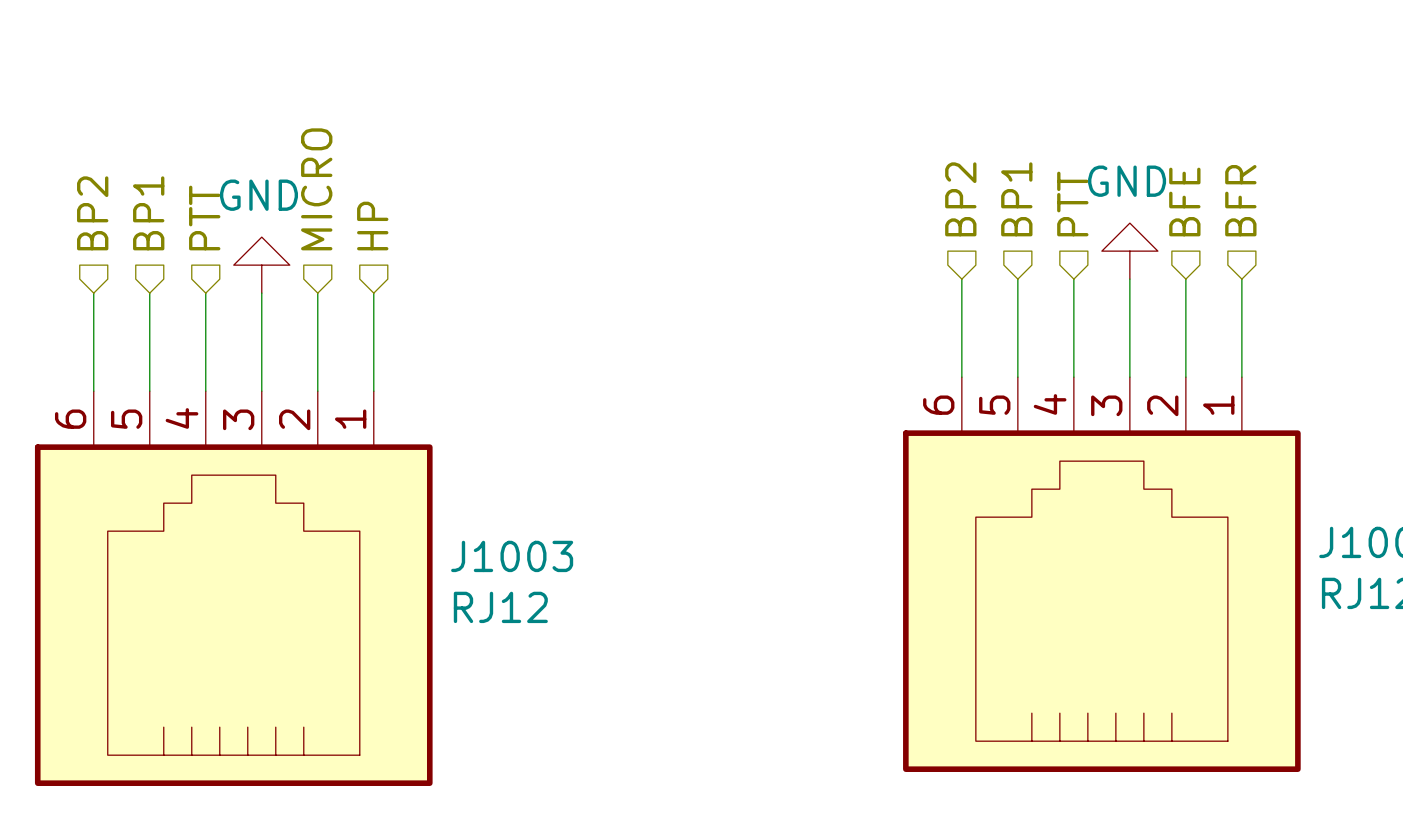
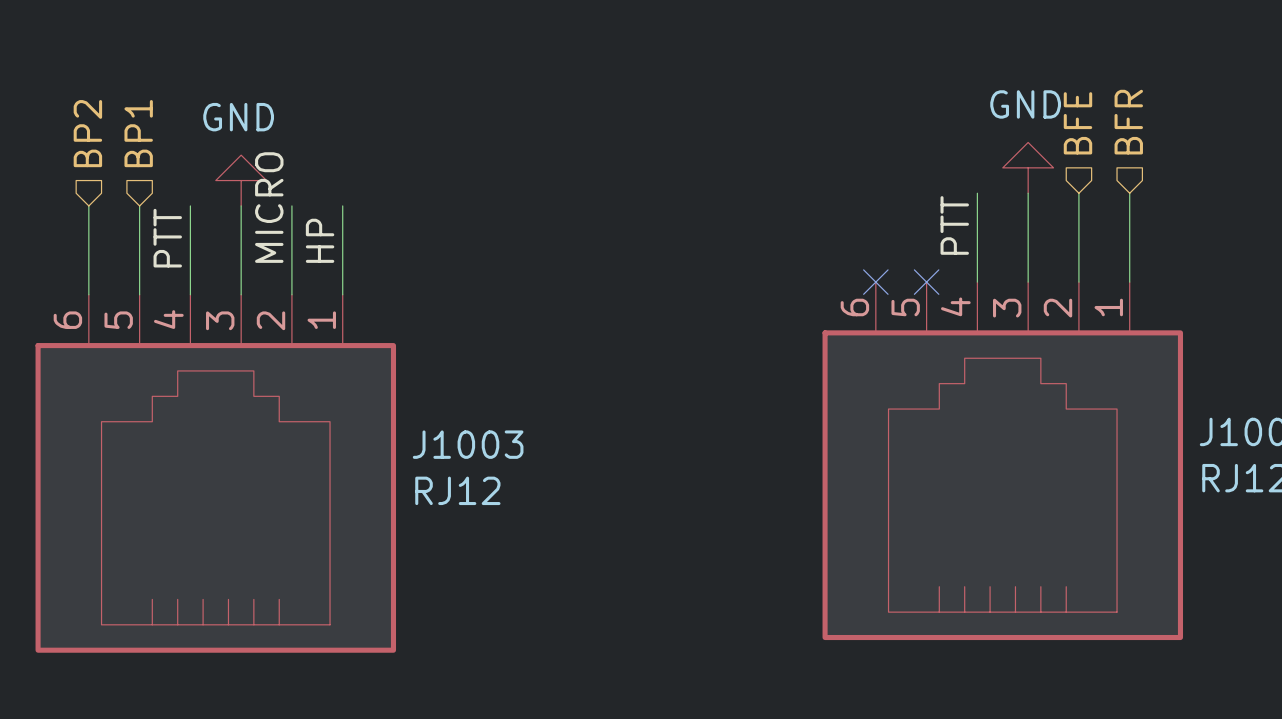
hierarchical label: MICRO (316, 189) -> none
hierarchical label: BP2 (960, 199) -> none
hierarchical label: BP1 (1016, 199) -> none
hierarchical label: PTT (1072, 204) -> none
hierarchical label: PTT (204, 218) -> none
hierarchical label: HP (372, 226) -> none
wire: (961, 279) (961, 377) -> none
wire: (1017, 279) (1017, 377) -> none
label: none -> MICRO (269, 207)
label: none -> PTT (954, 225)
label: none -> PTT (167, 238)
label: none -> HP (320, 240)
no-connect mark: none -> (875, 282)
no-connect mark: none -> (926, 282)

